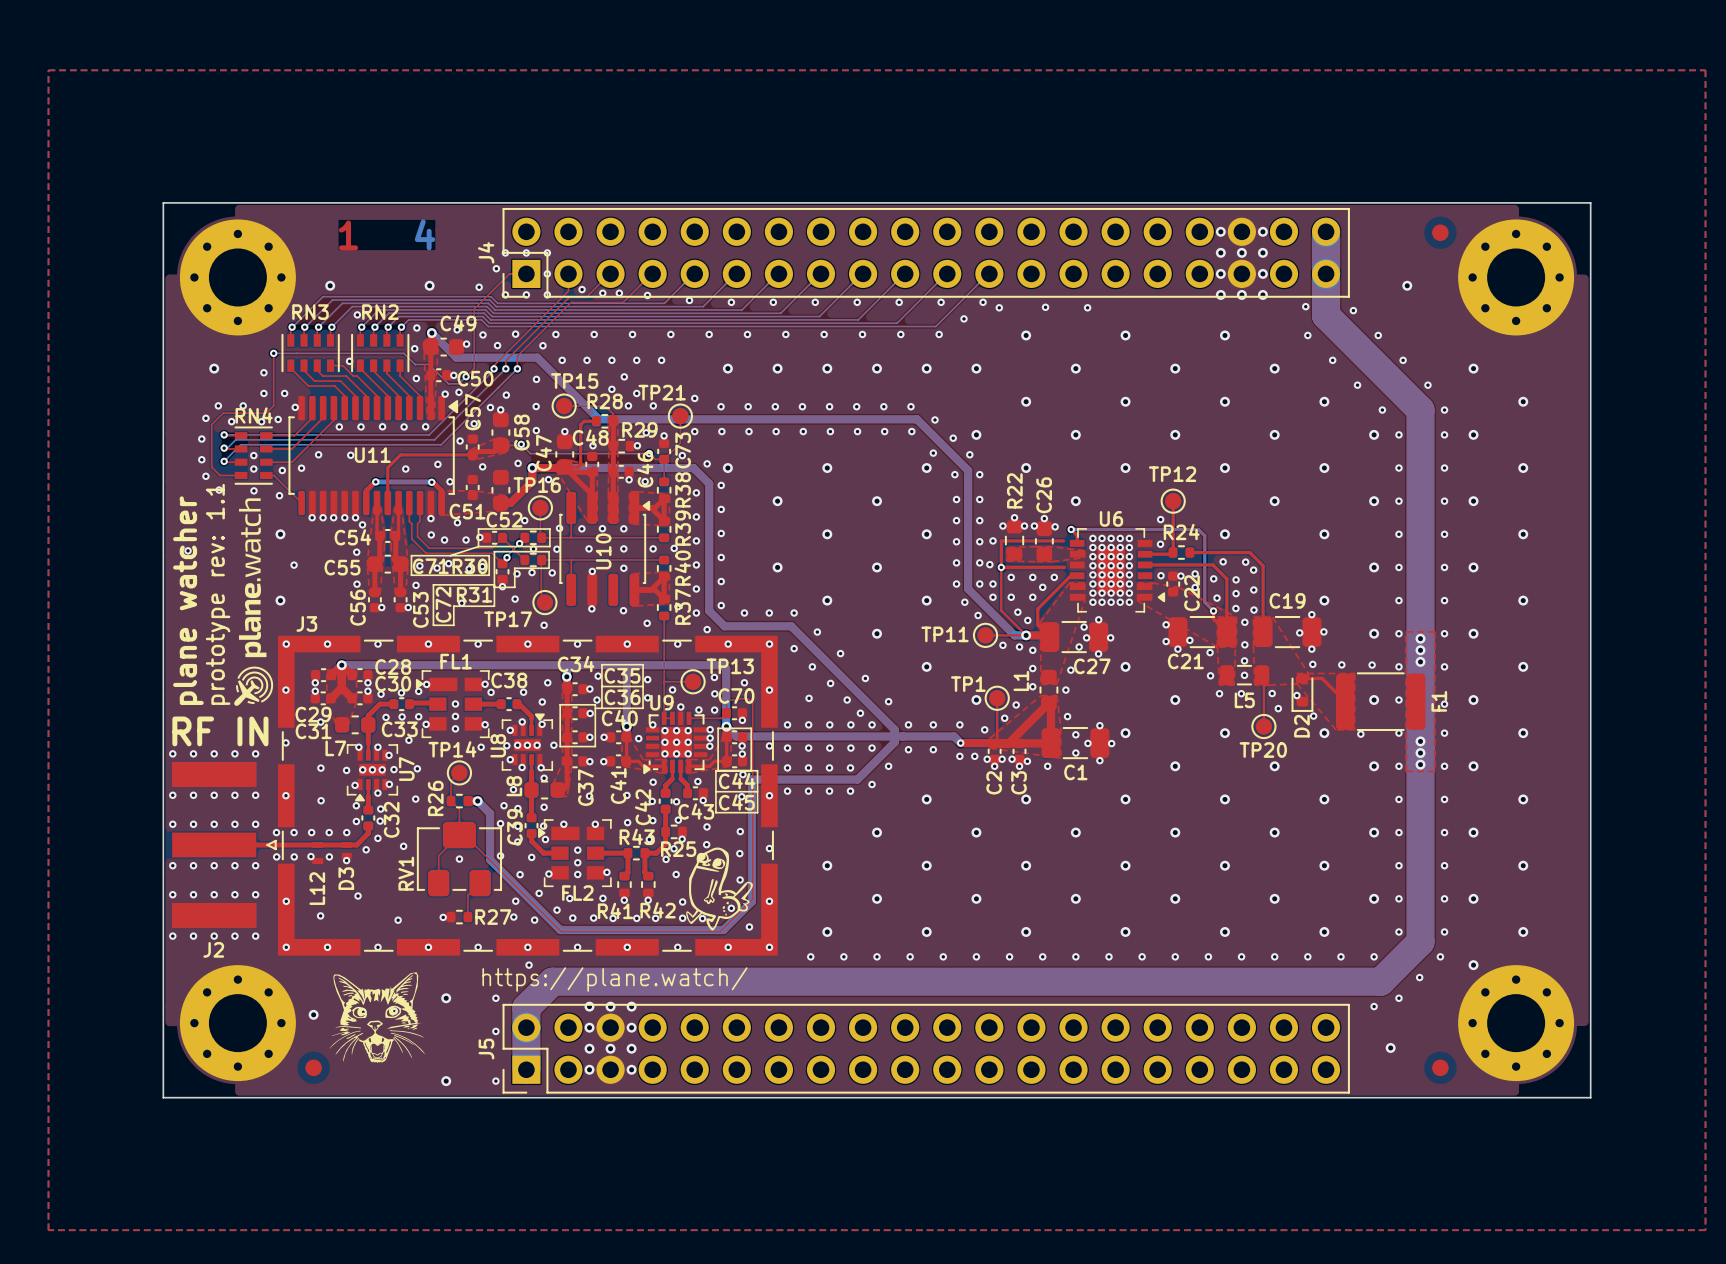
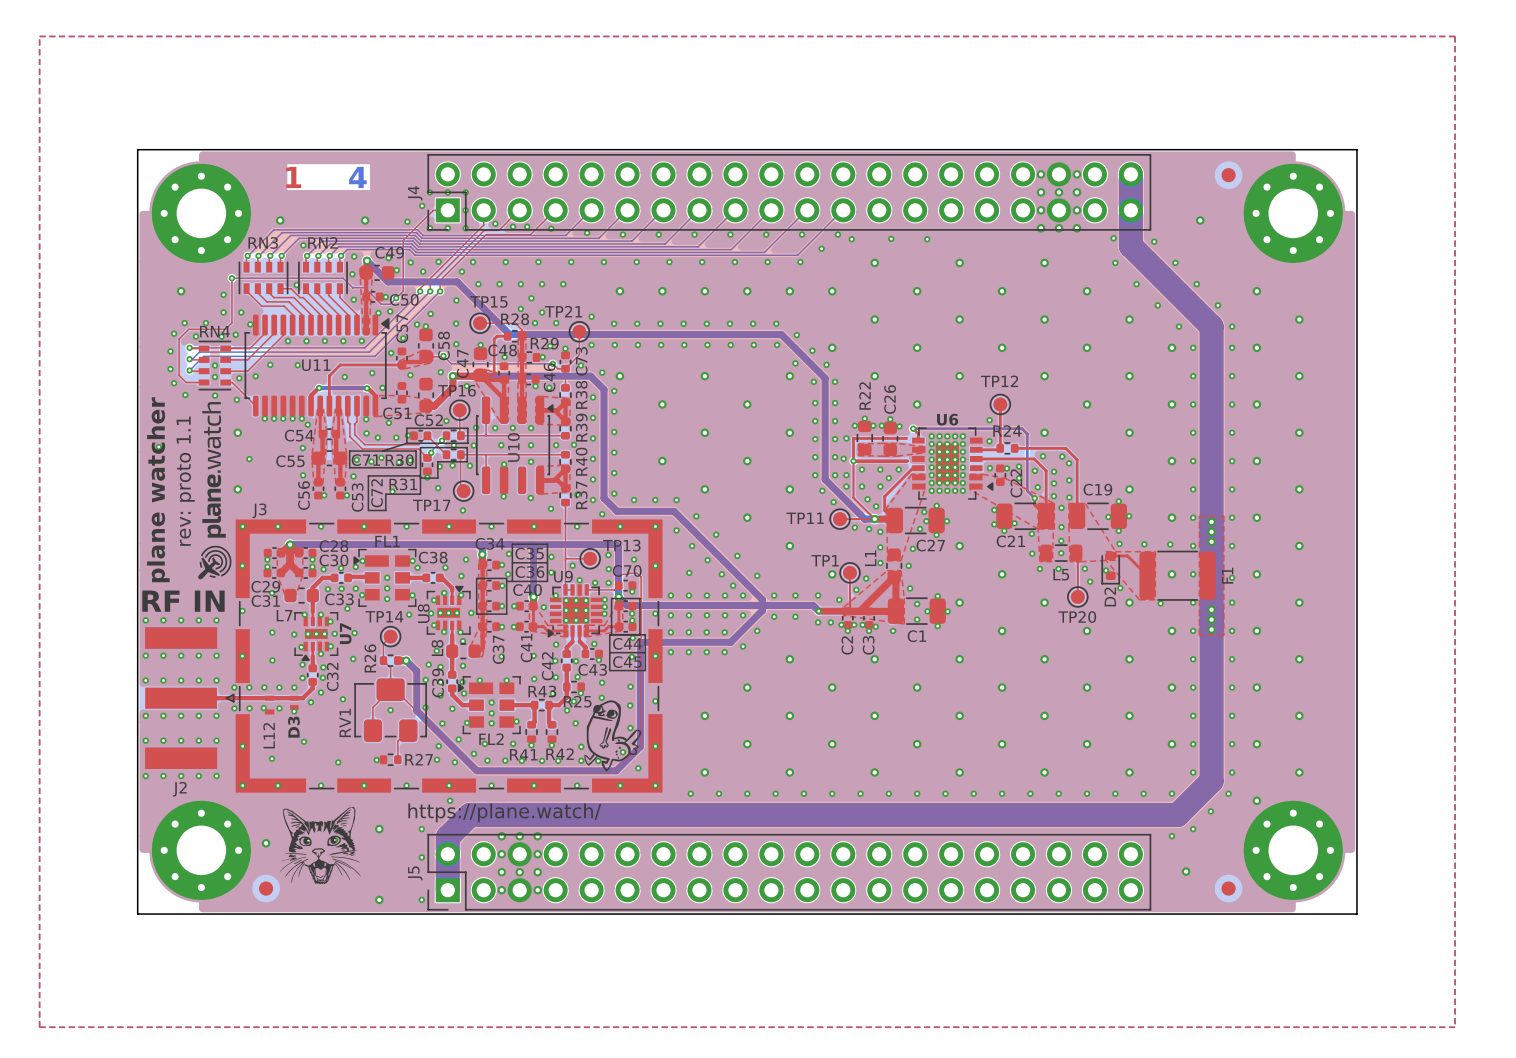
text: prototype rev: 1.1 (218, 594) -> rev: proto 1.1 (185, 481)

